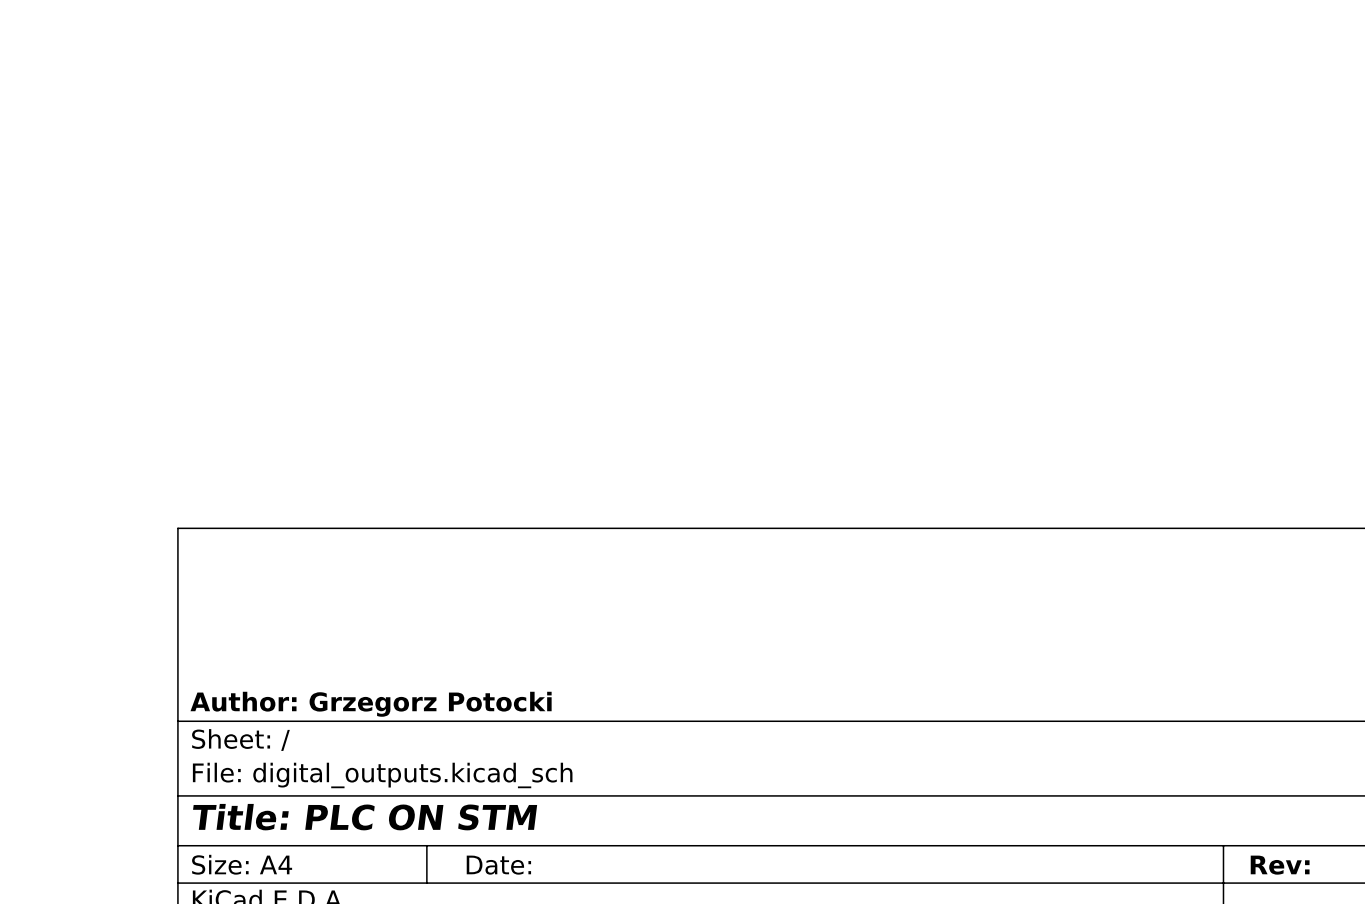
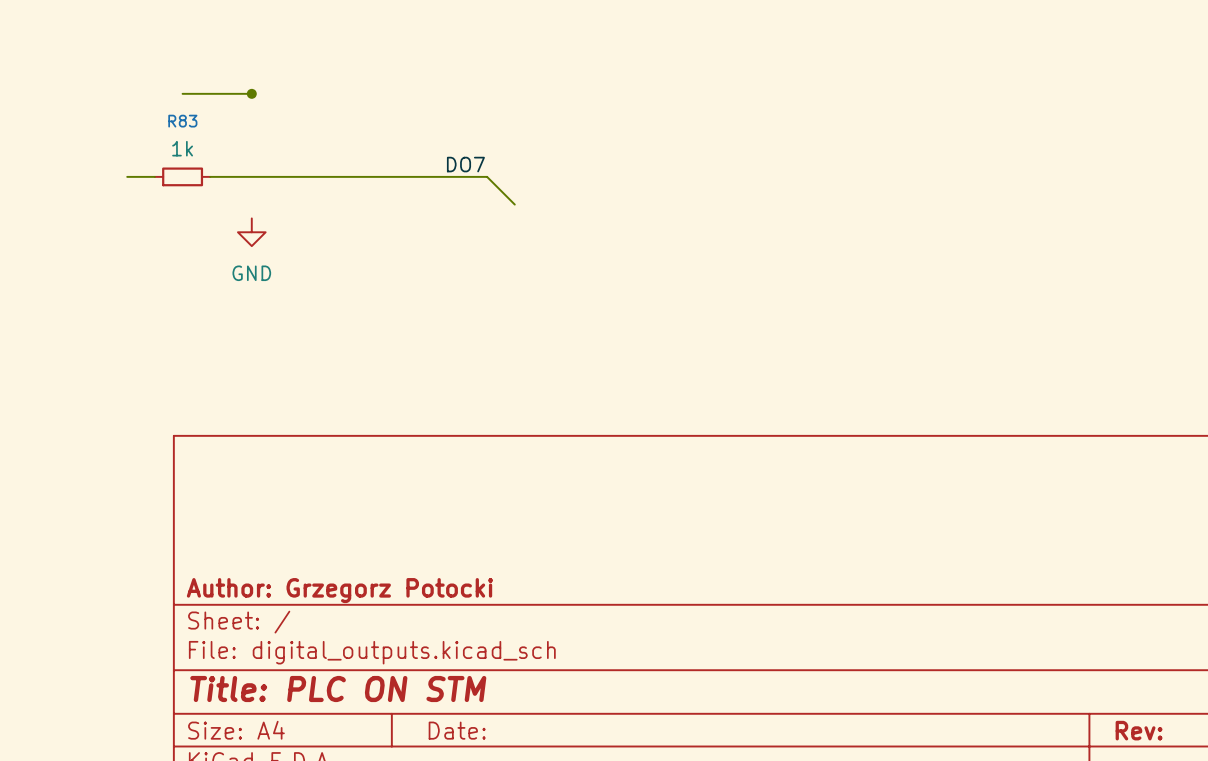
wire: none -> (182, 93) (251, 93)
junction: none -> (251, 93)
label: none -> DO7 (465, 164)
wire: none -> (127, 176) (154, 176)
R83: none -> 1k (182, 176)
wire: none -> (210, 176) (487, 176) (514, 204)
power symbol: none -> GND (251, 232)

